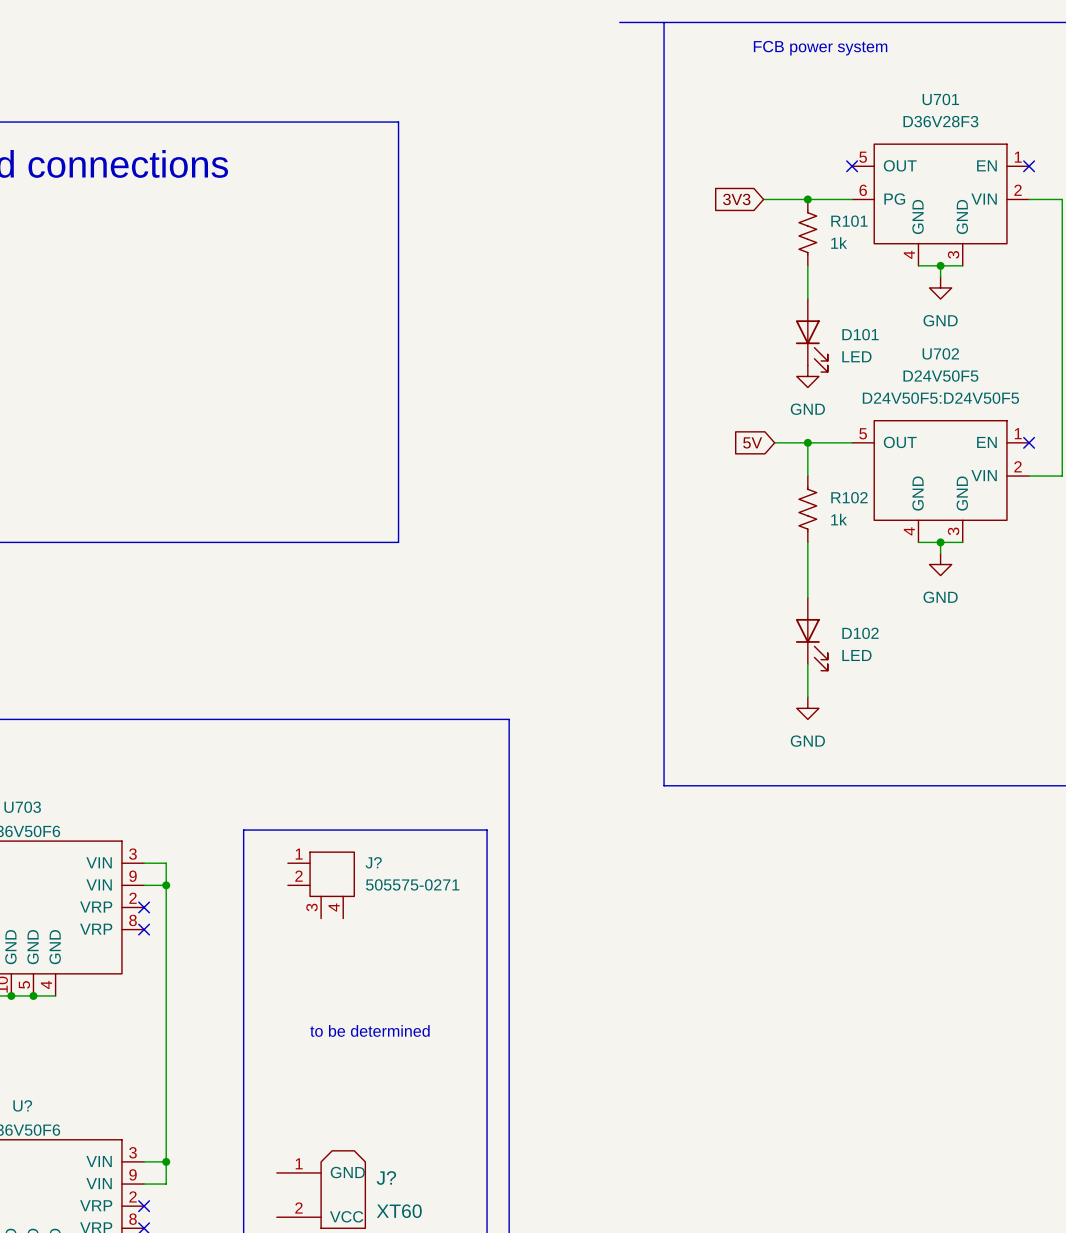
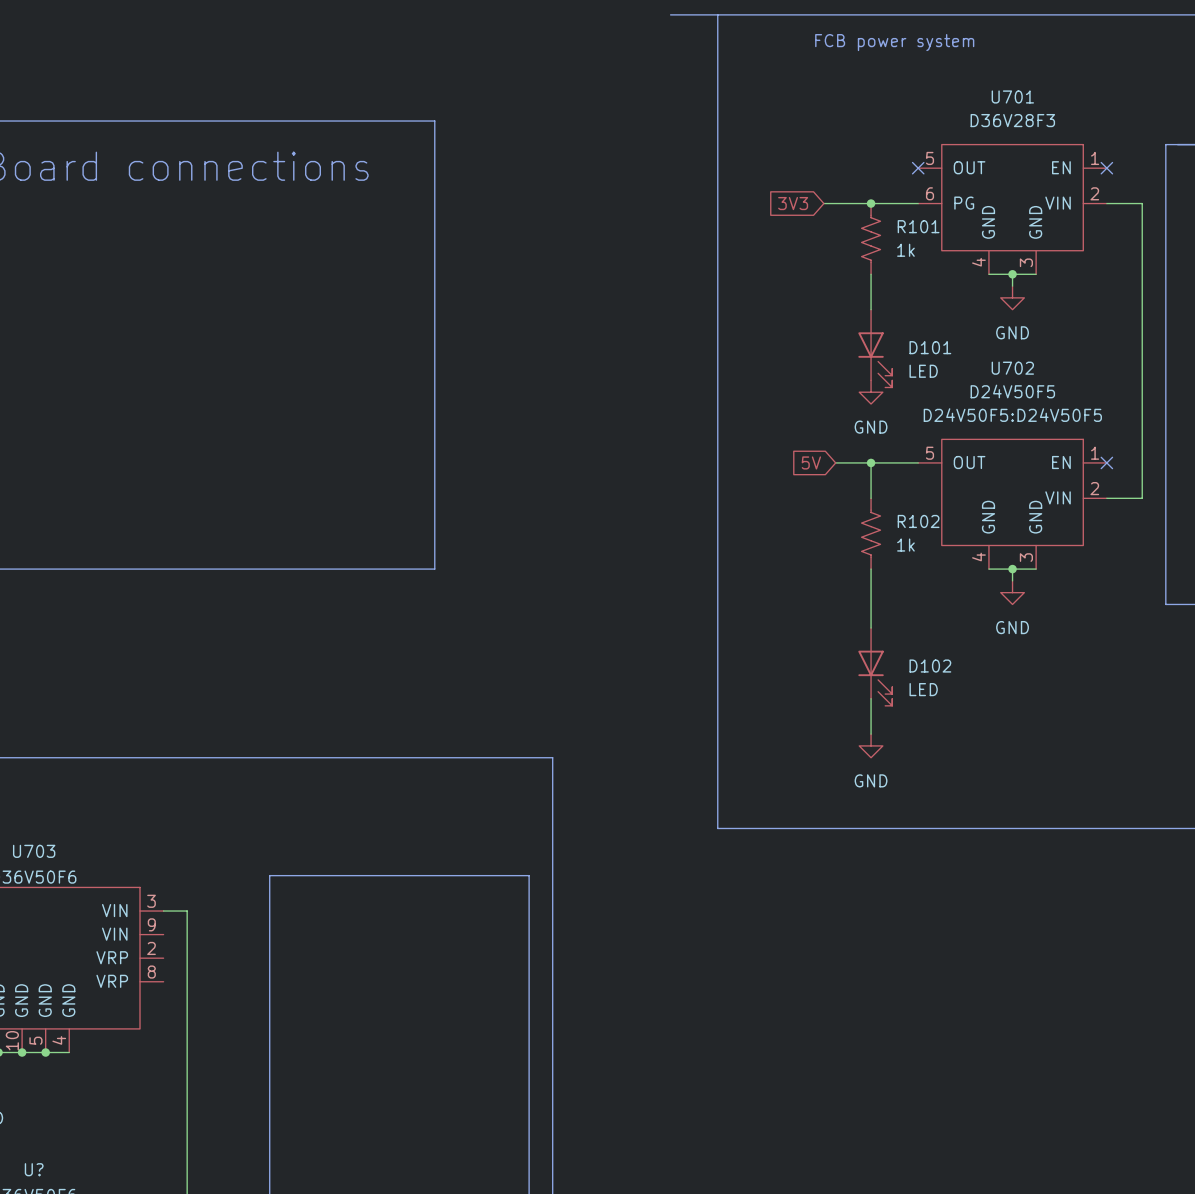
wire: (144, 885) (166, 885) -> none
junction: (166, 885) -> none
J?: 505575-0271 (321, 885) -> none
no-connect mark: (144, 907) -> none
no-connect mark: (144, 929) -> none
text: to be determined (369, 1030) -> none

